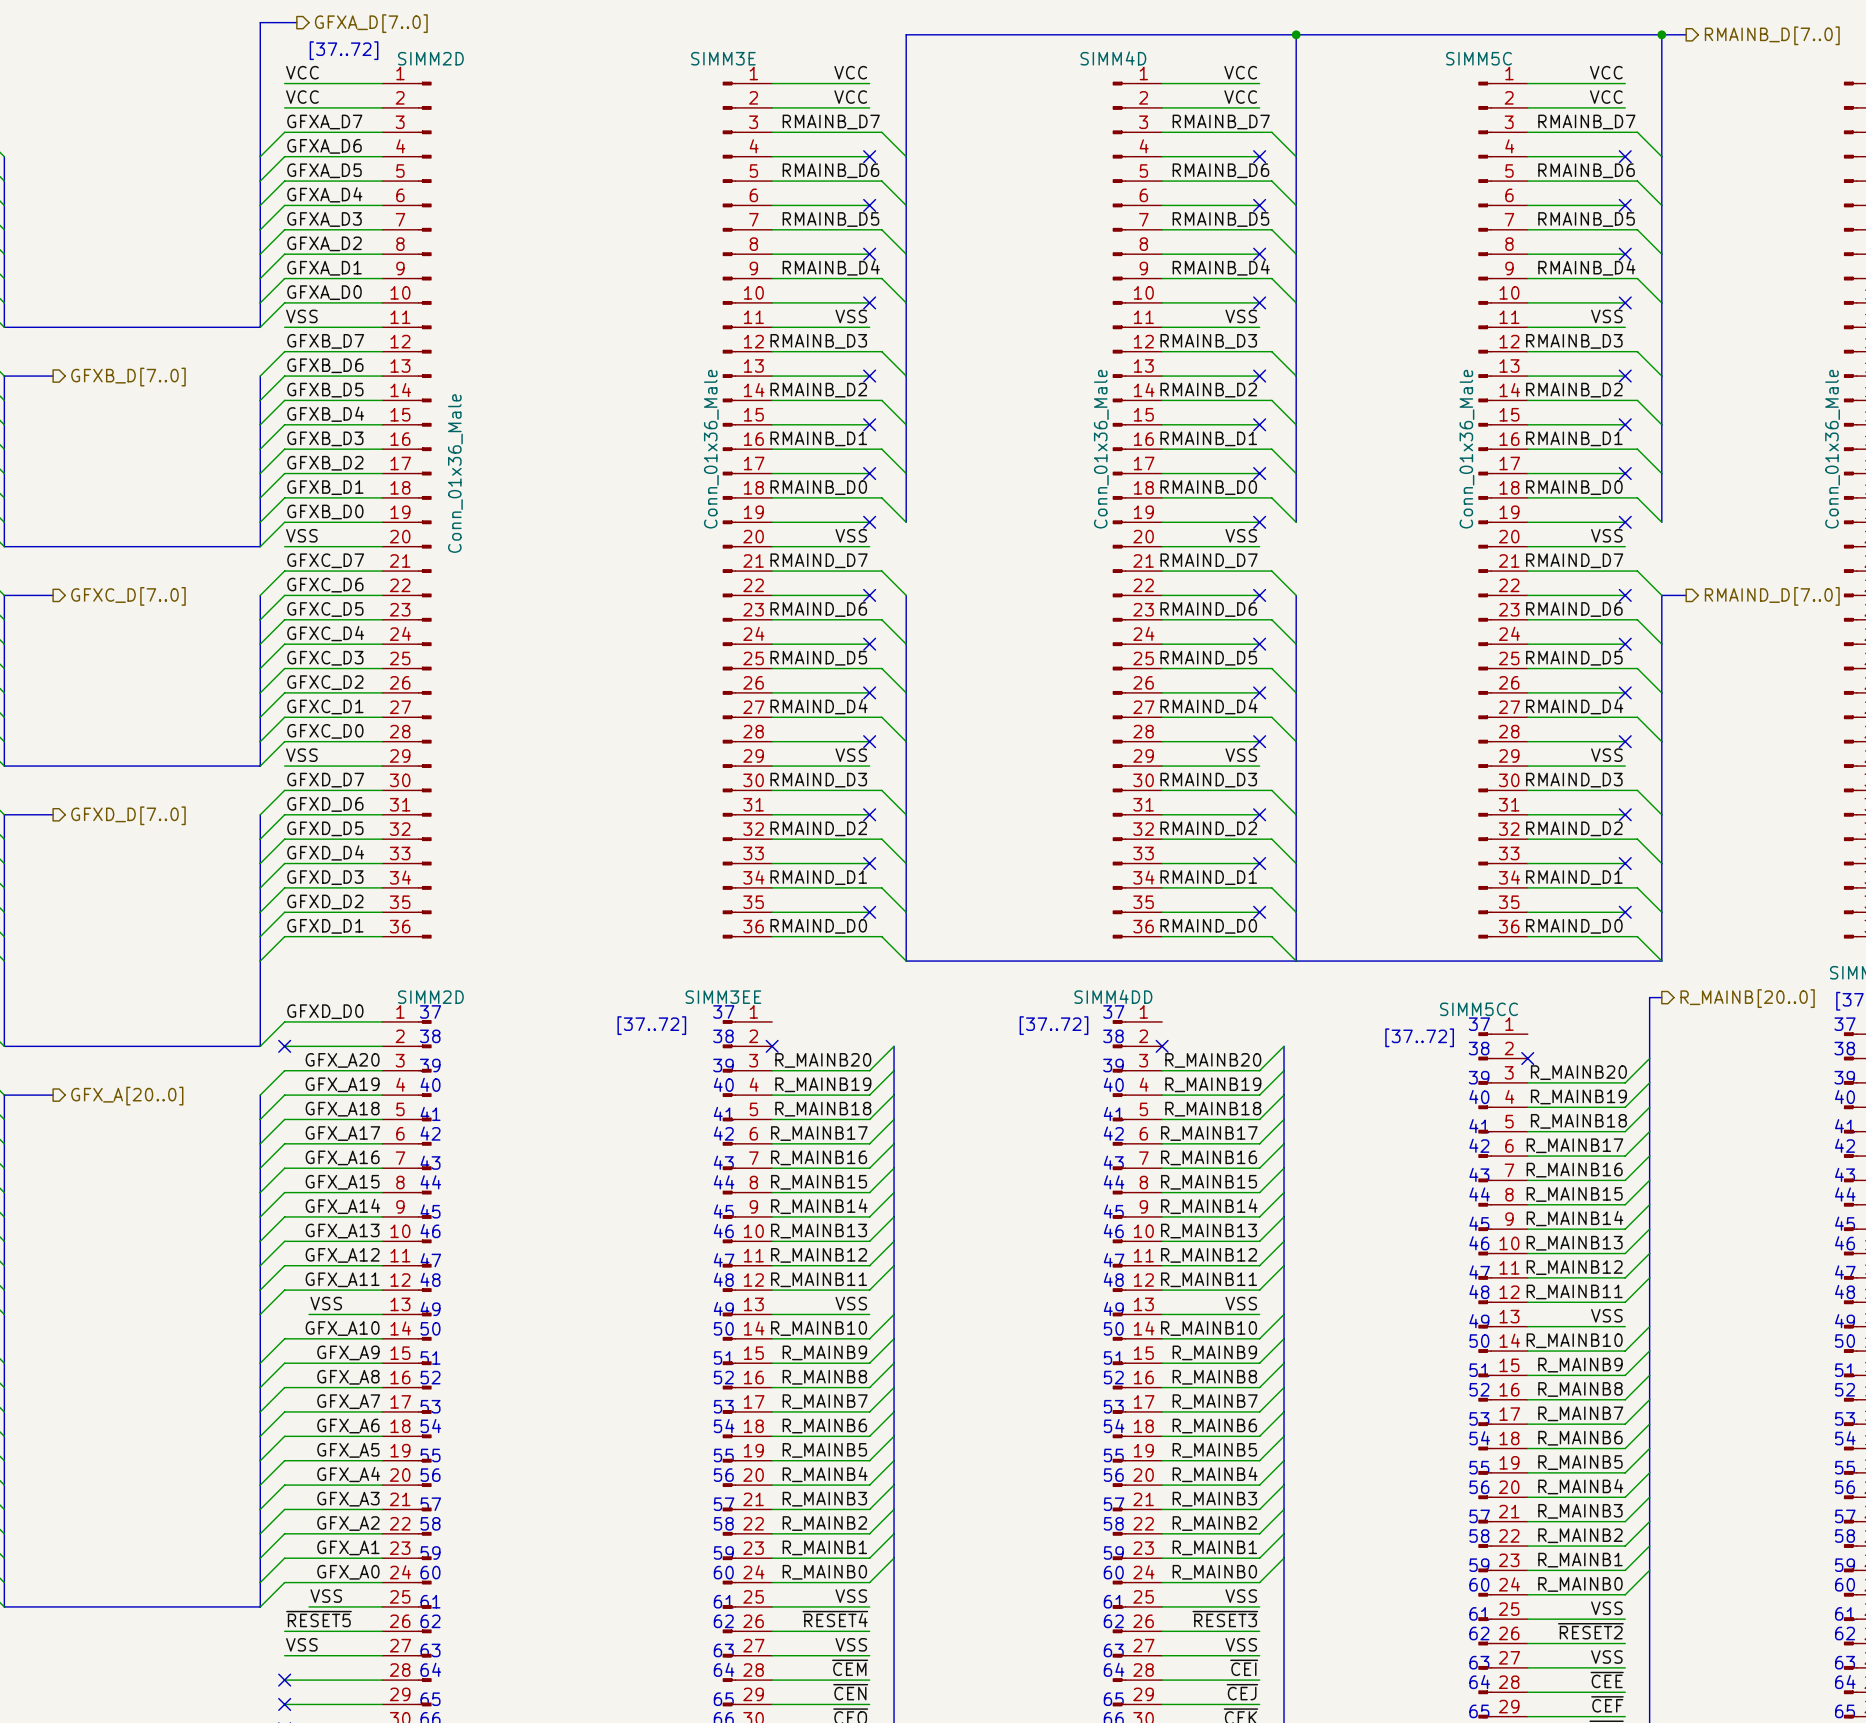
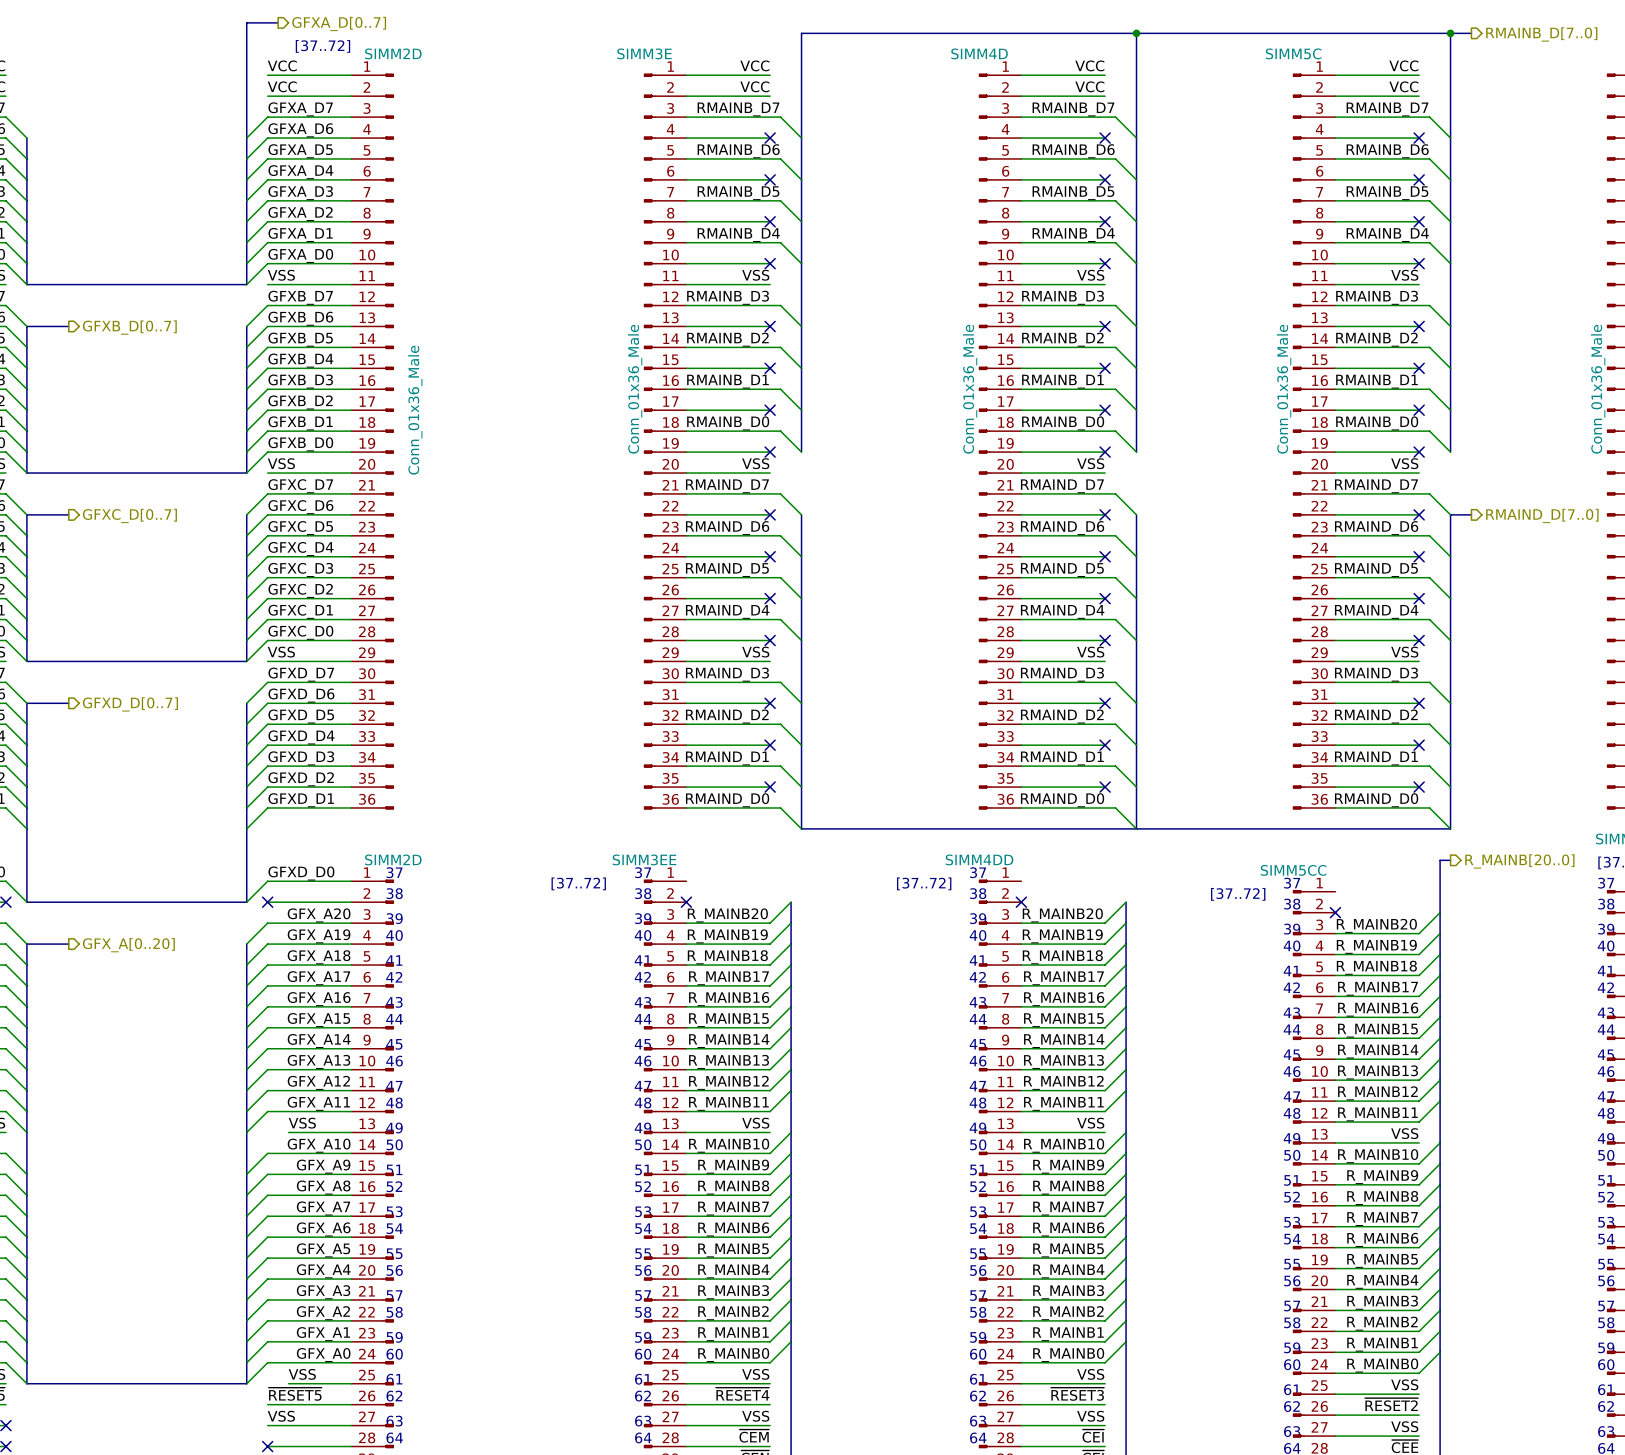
hierarchical label: GFXA_D[7..0] (371, 23) -> GFXA_D[0..7] (339, 23)
hierarchical label: GFXB_D[7..0] (128, 377) -> GFXB_D[0..7] (129, 327)
hierarchical label: GFXC_D[7..0] (128, 596) -> GFXC_D[0..7] (129, 515)
hierarchical label: GFXD_D[7..0] (128, 815) -> GFXD_D[0..7] (130, 704)
hierarchical label: GFX_A[20..0] (127, 1096) -> GFX_A[0..20] (128, 945)

